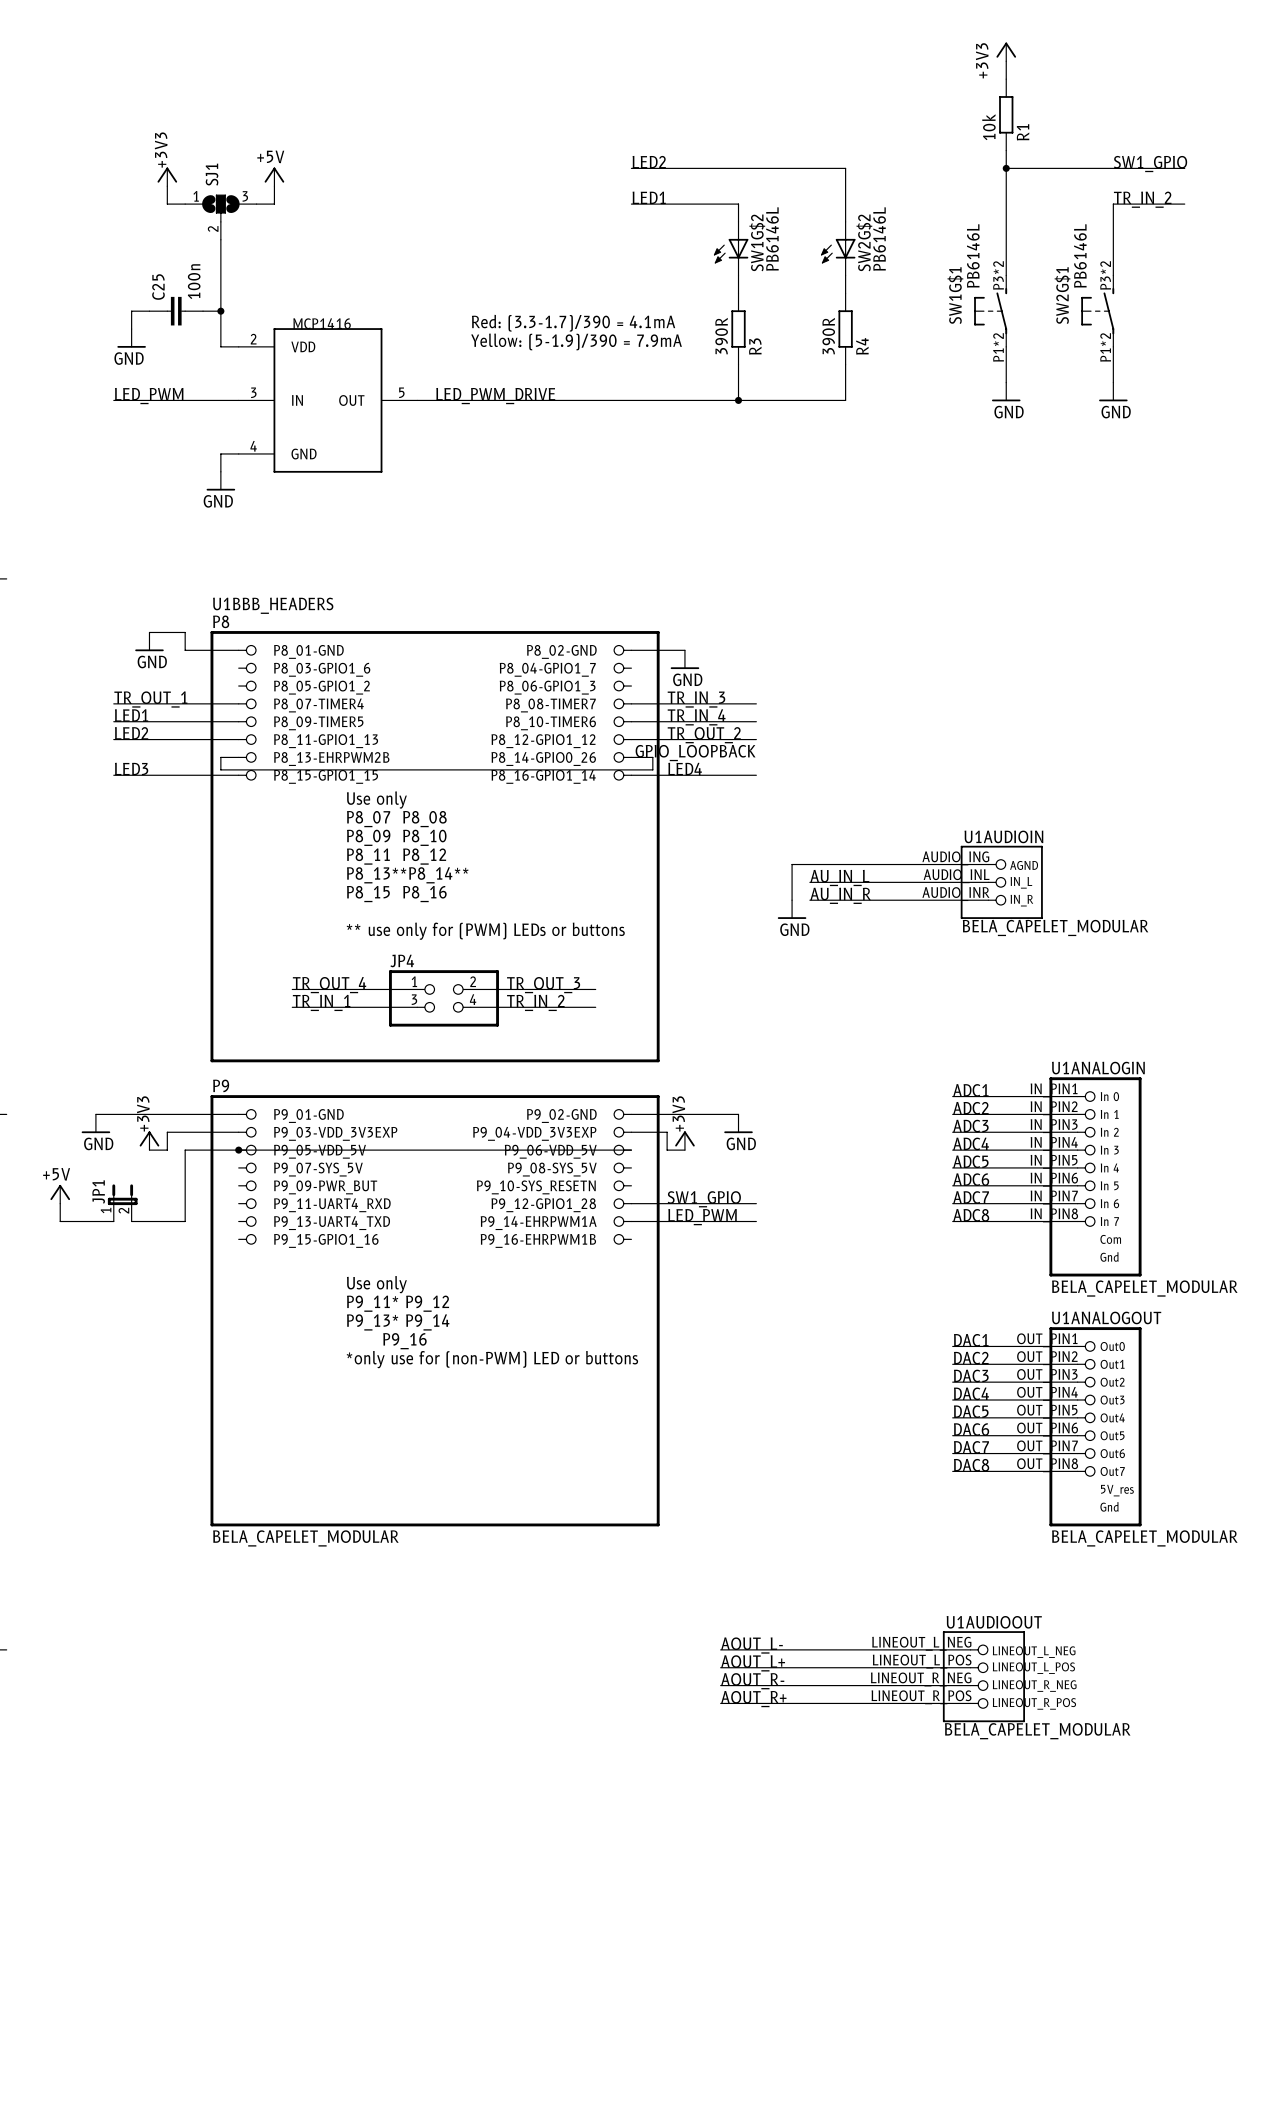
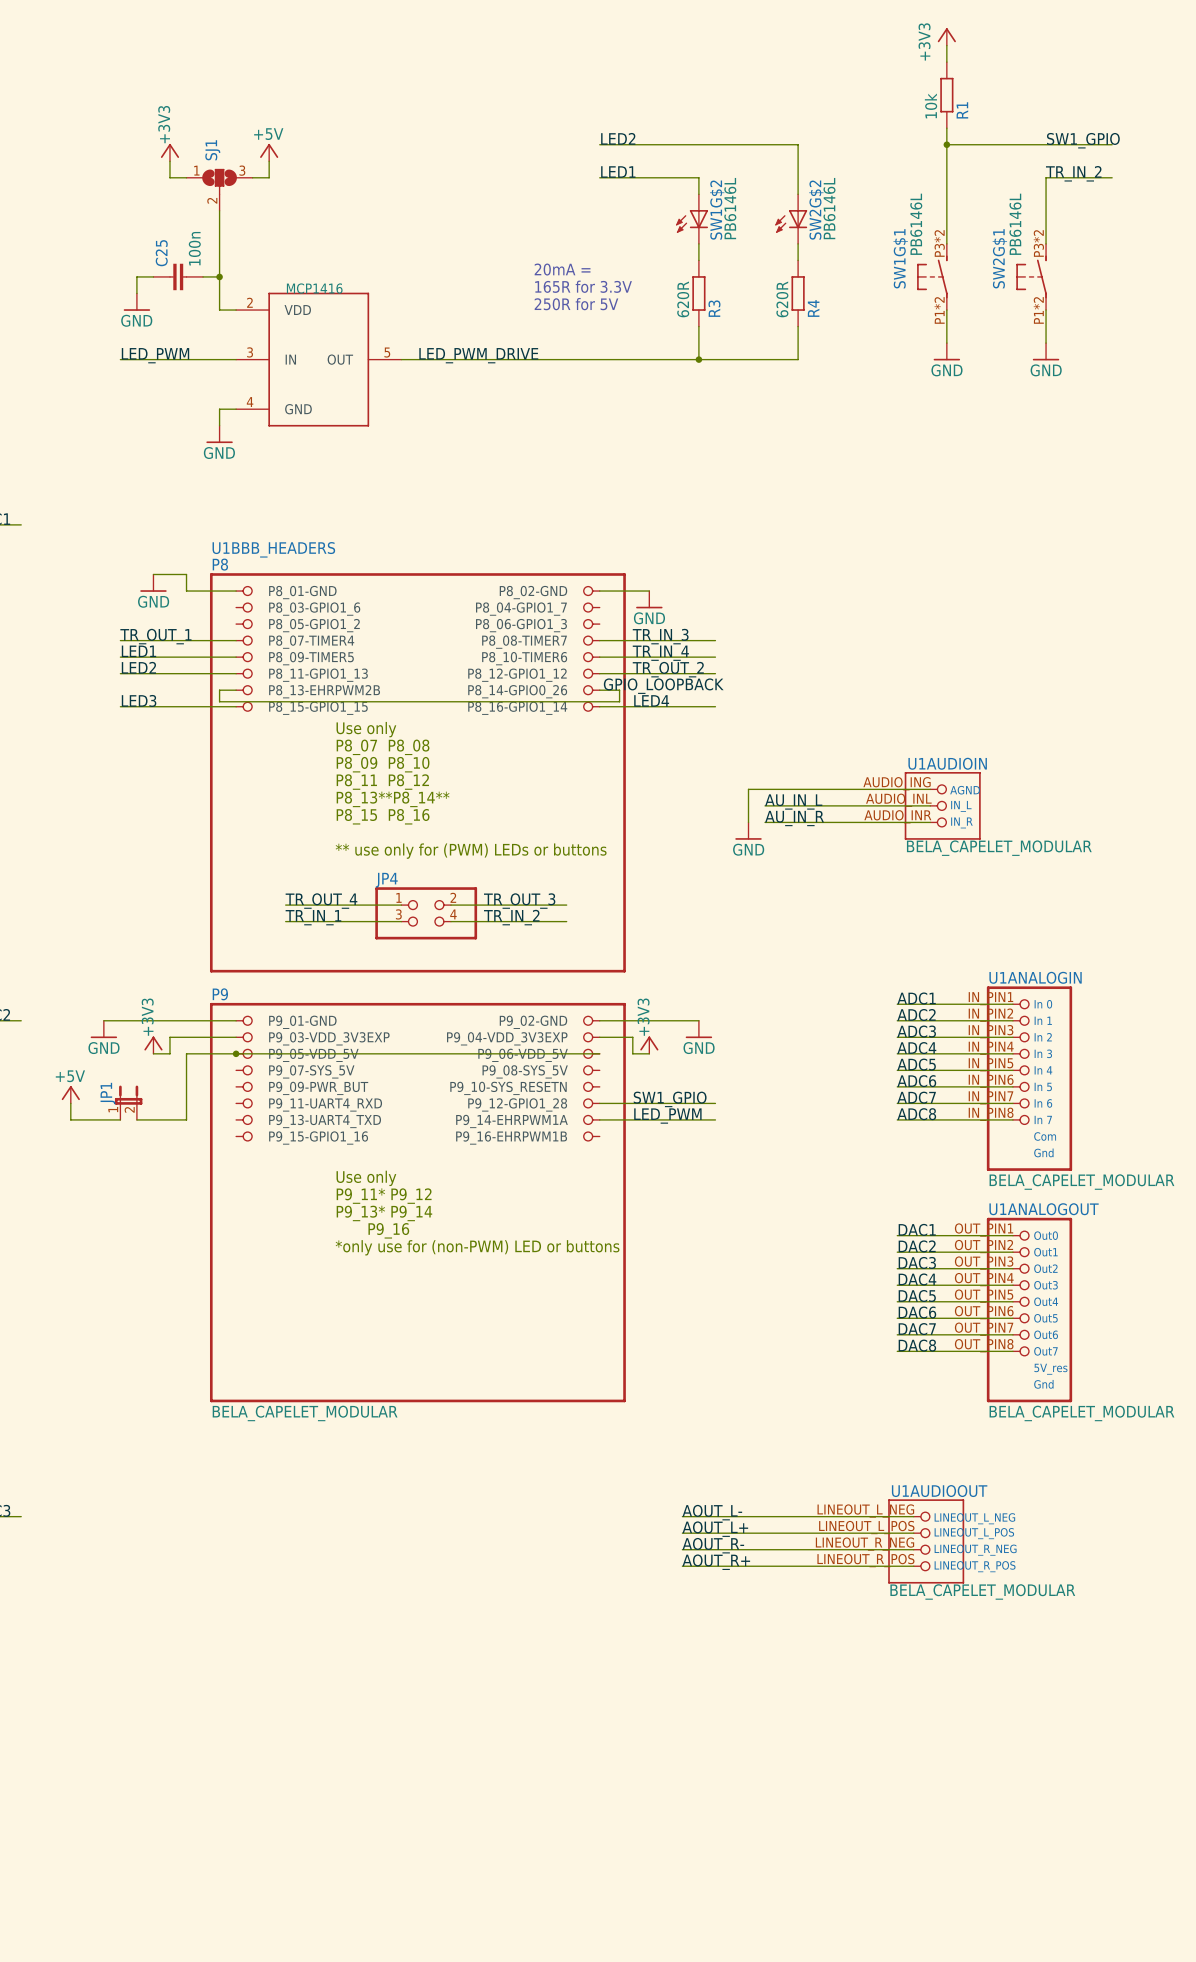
text: none -> 20mA = (562, 269)
text: none -> 165R for 3.3V (583, 286)
text: Red: (3.3-1.7)/390 = 4.1mA (573, 323) -> none
R3 value: 390R (721, 336) -> 620R (683, 299)
R4 value: 390R (828, 336) -> 620R (782, 299)
text: none -> 250R for 5V (576, 304)
text: Yellow: (5-1.9)/390 = 7.9mA (576, 341) -> none

